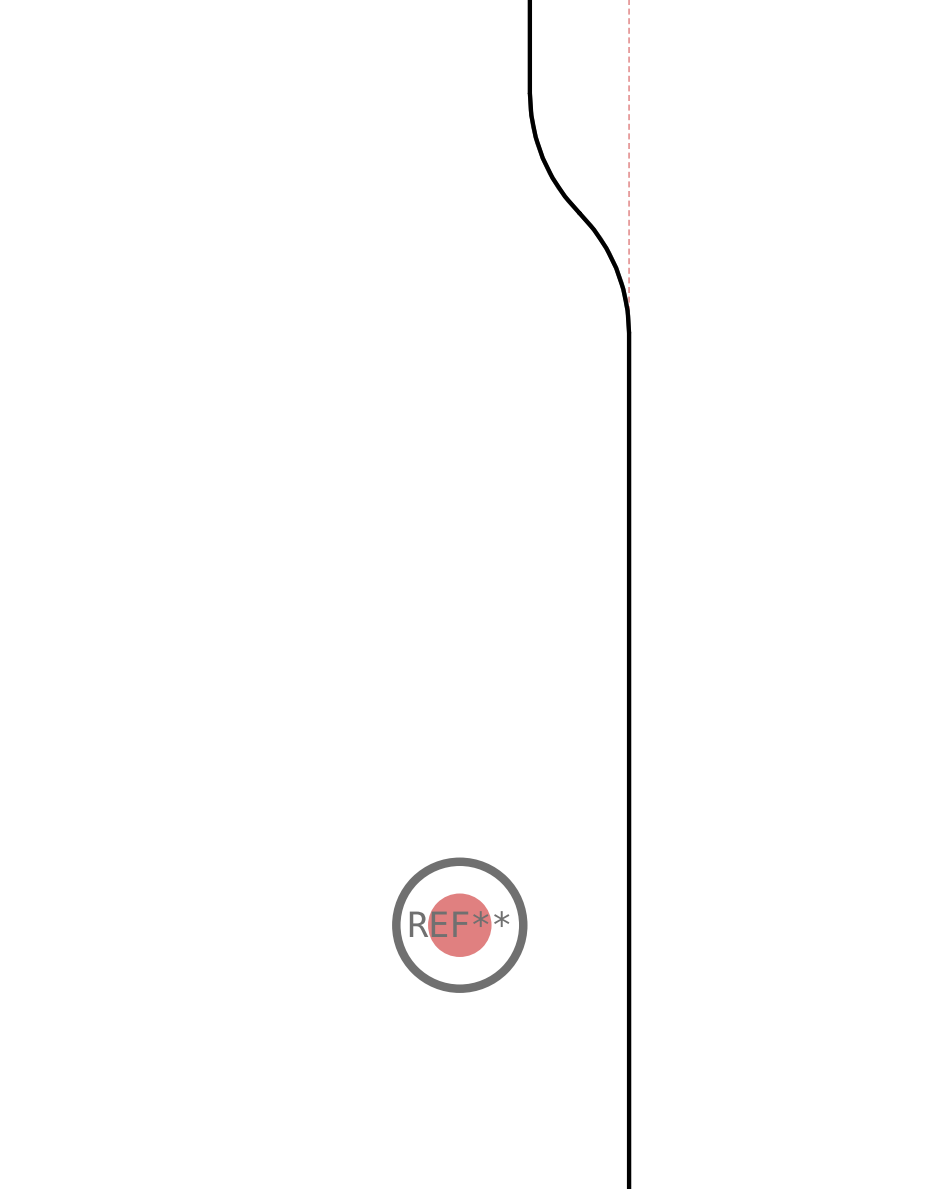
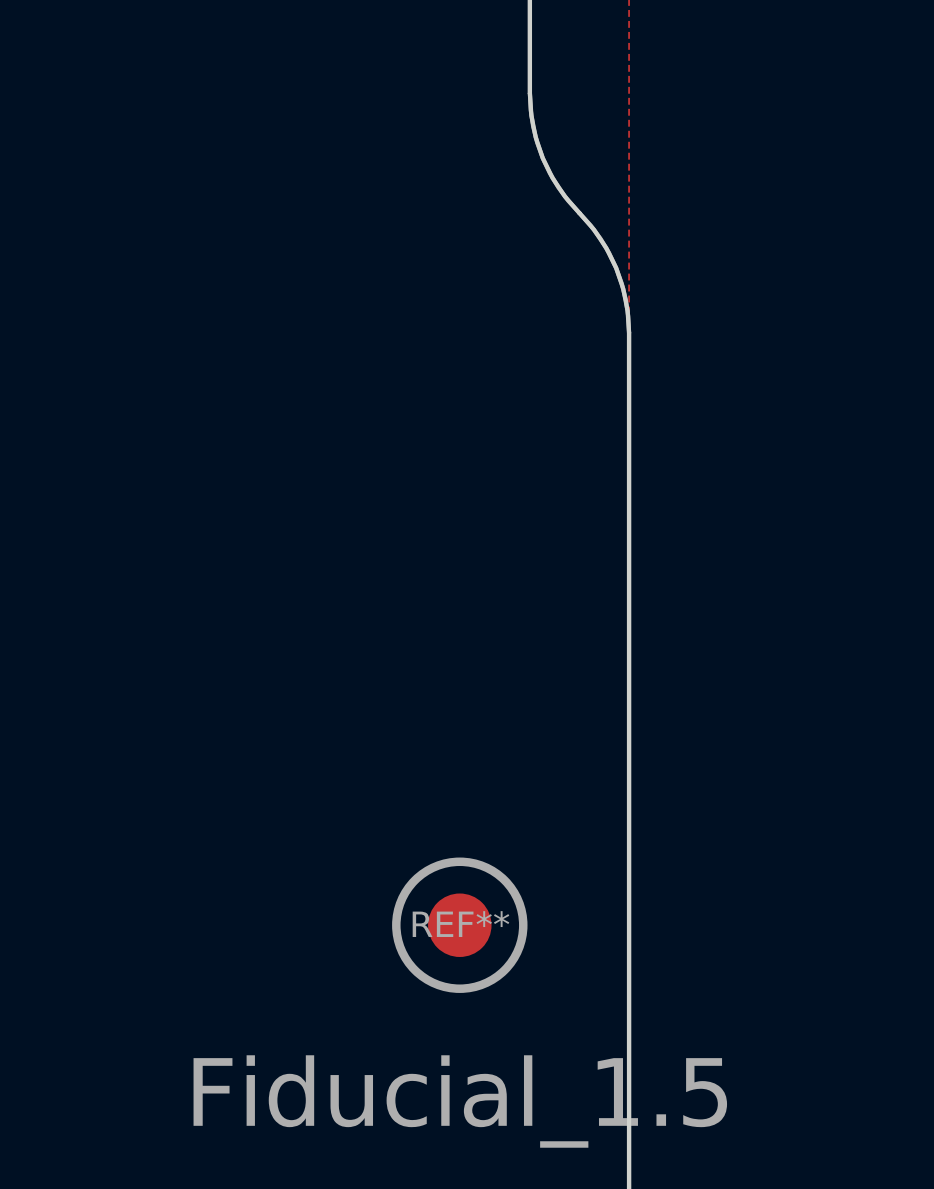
REF** value: none -> Fiducial_1.5 (460, 1101)

